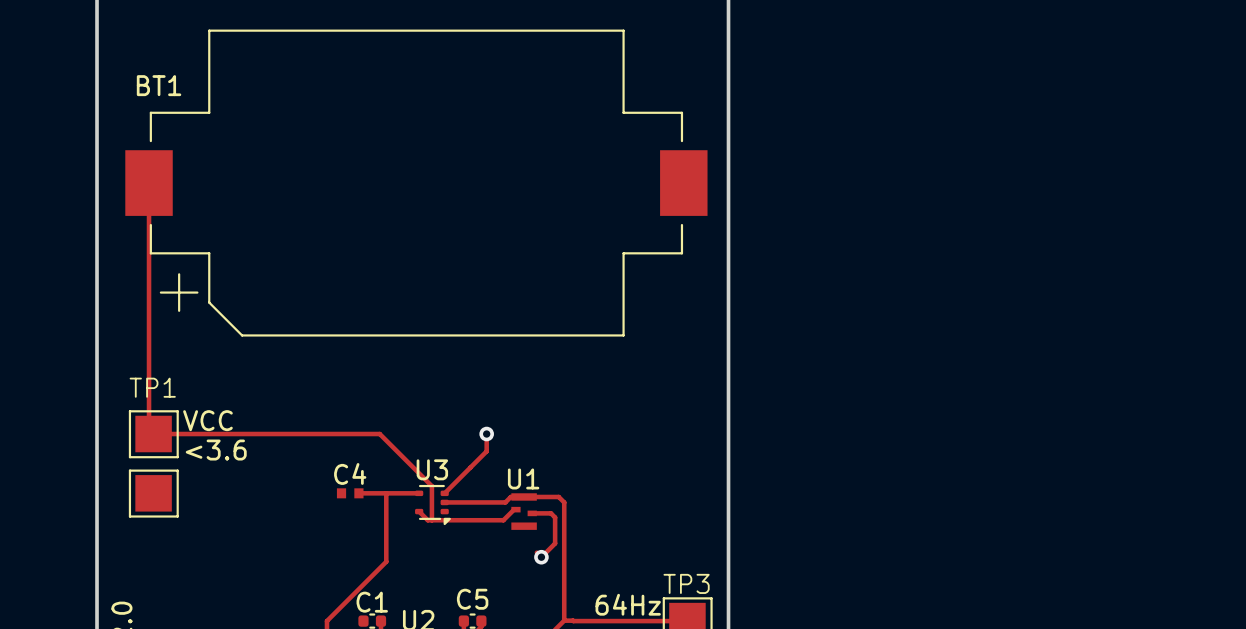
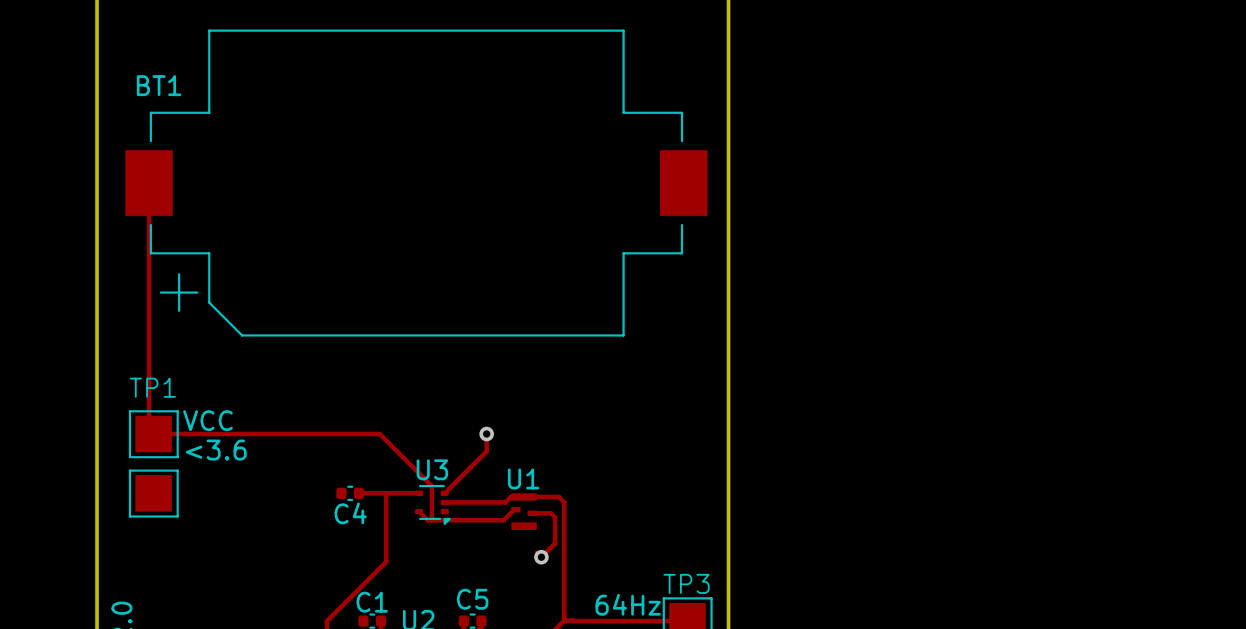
C4 name position: C4 (350, 473) -> C4 (350, 513)
C4 footprint: [336, 488, 364, 499] -> [336, 485, 365, 501]

